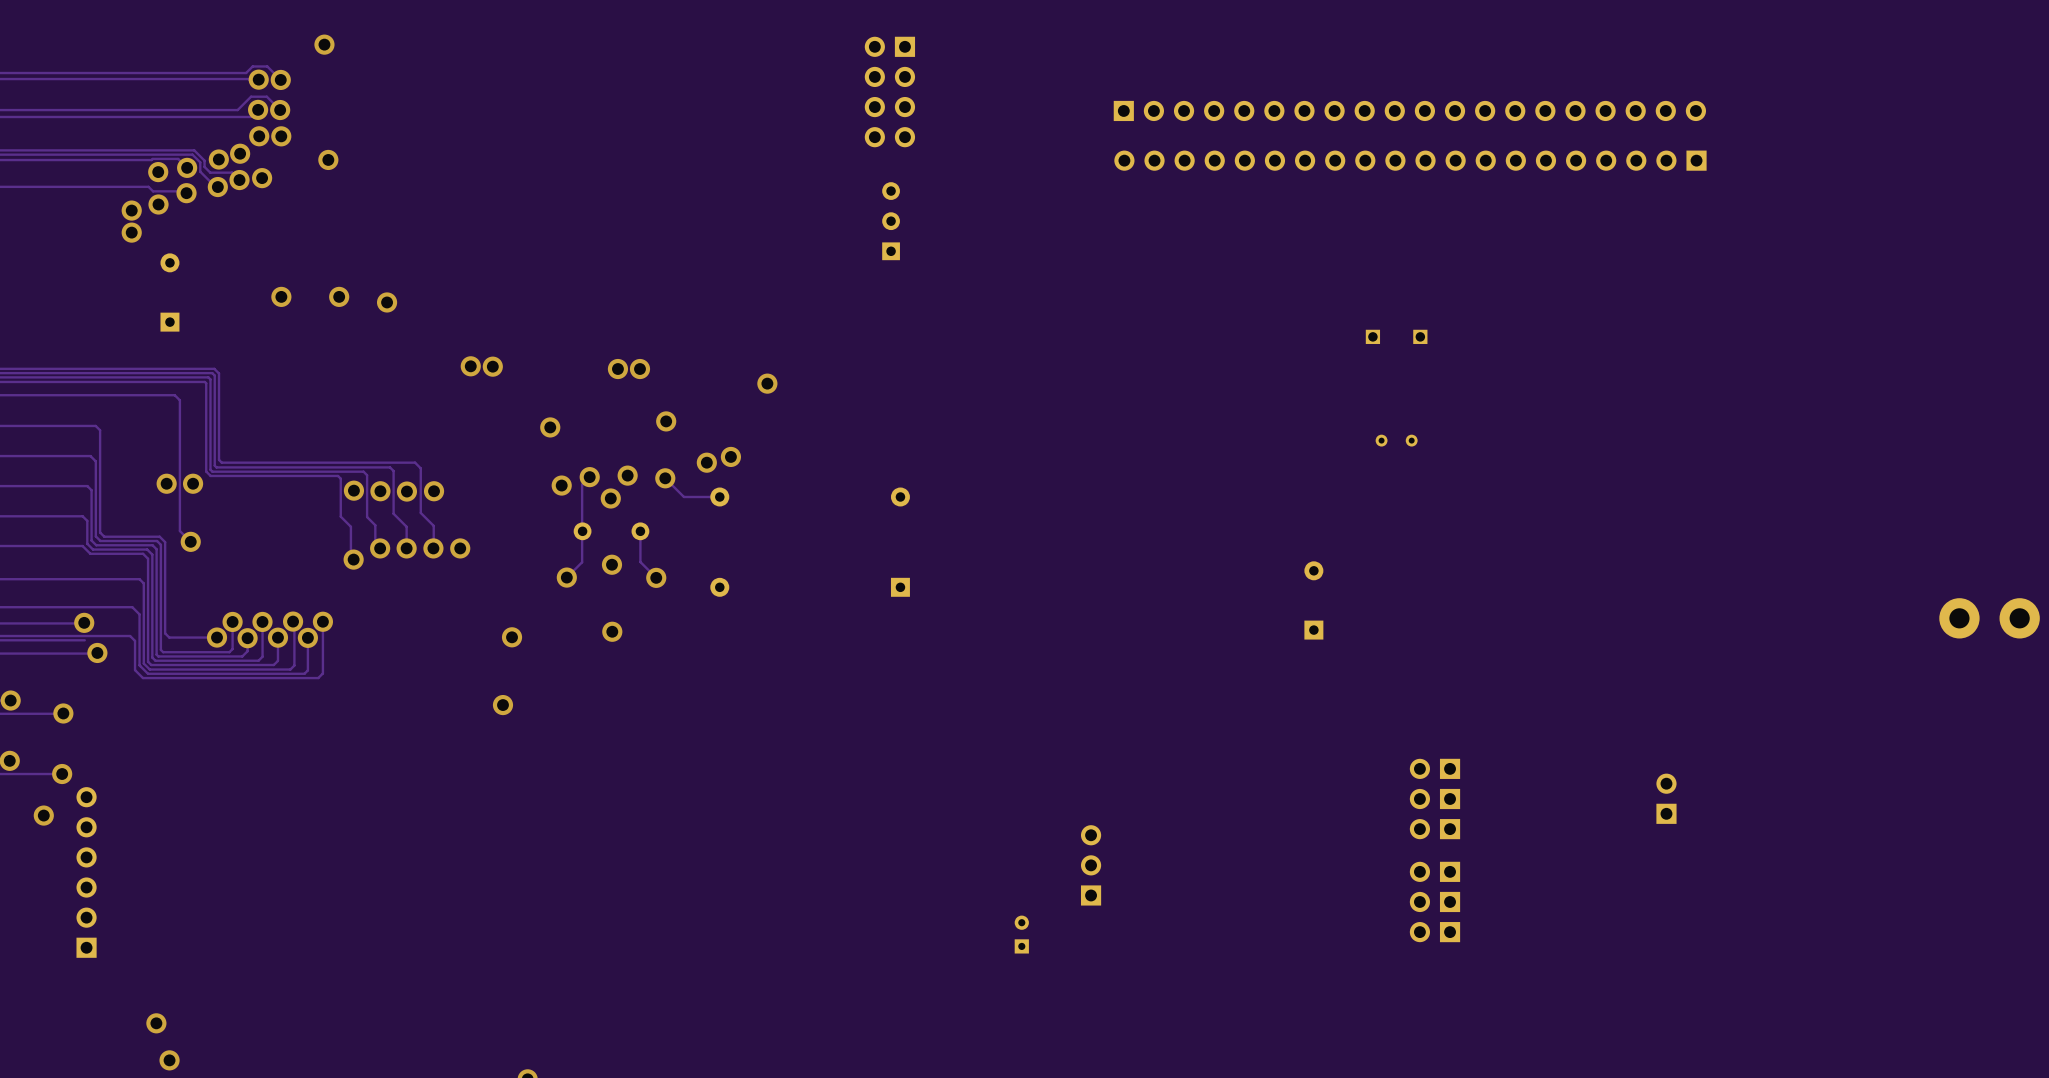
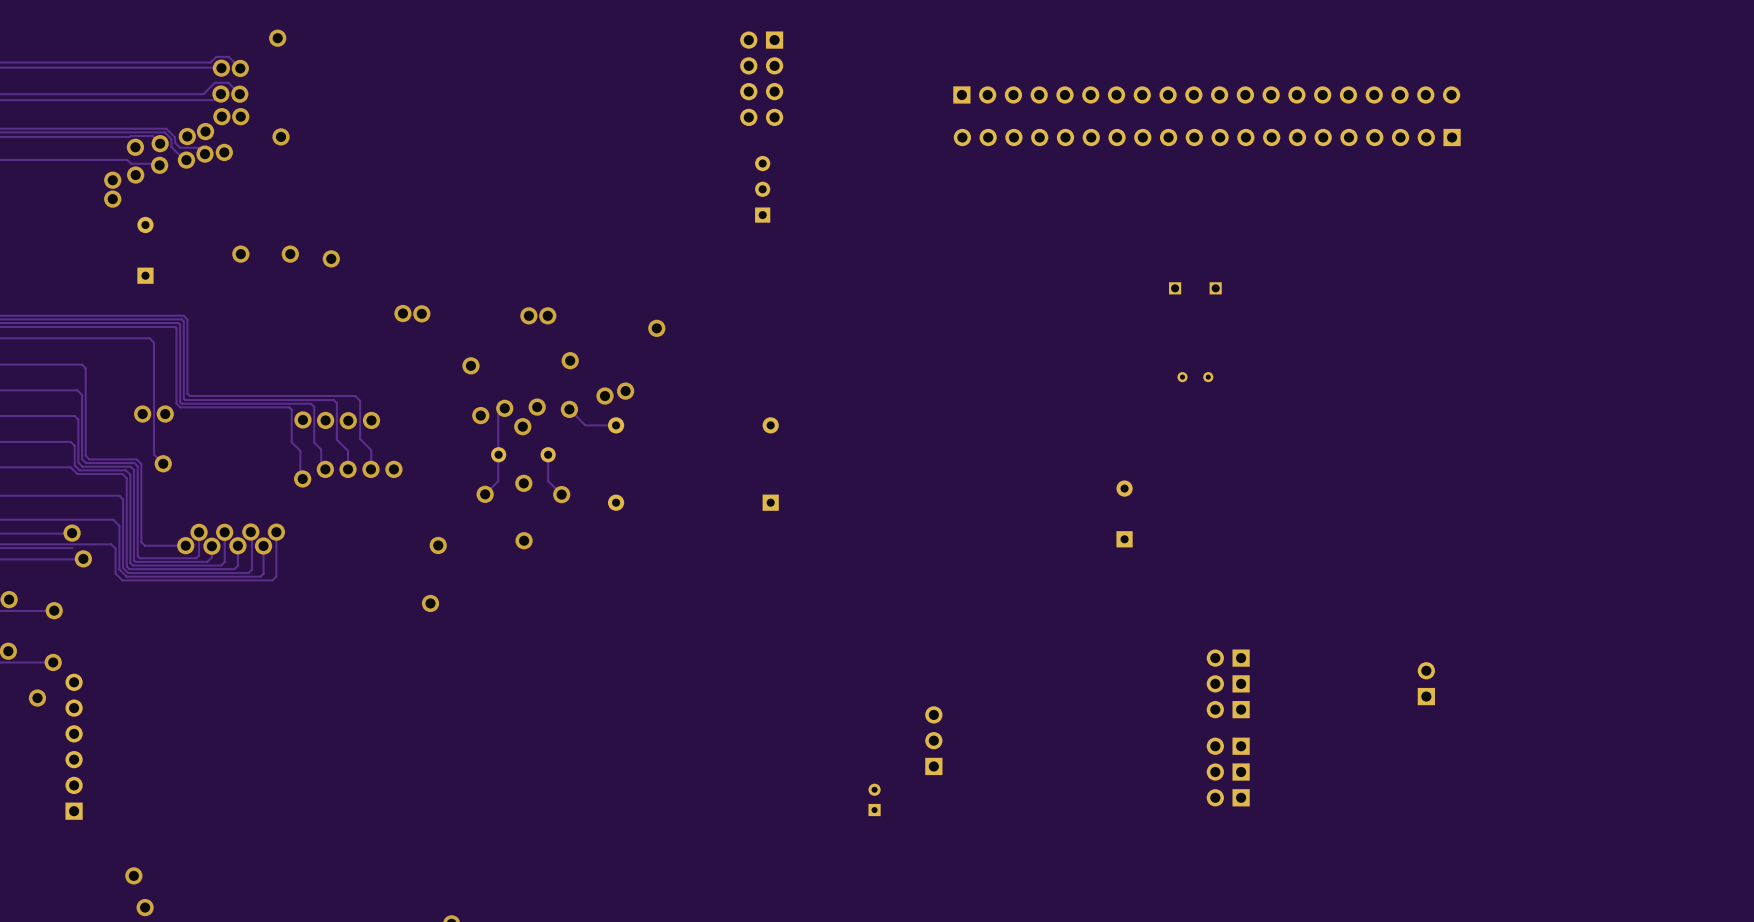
part: (1989, 618) -> none

